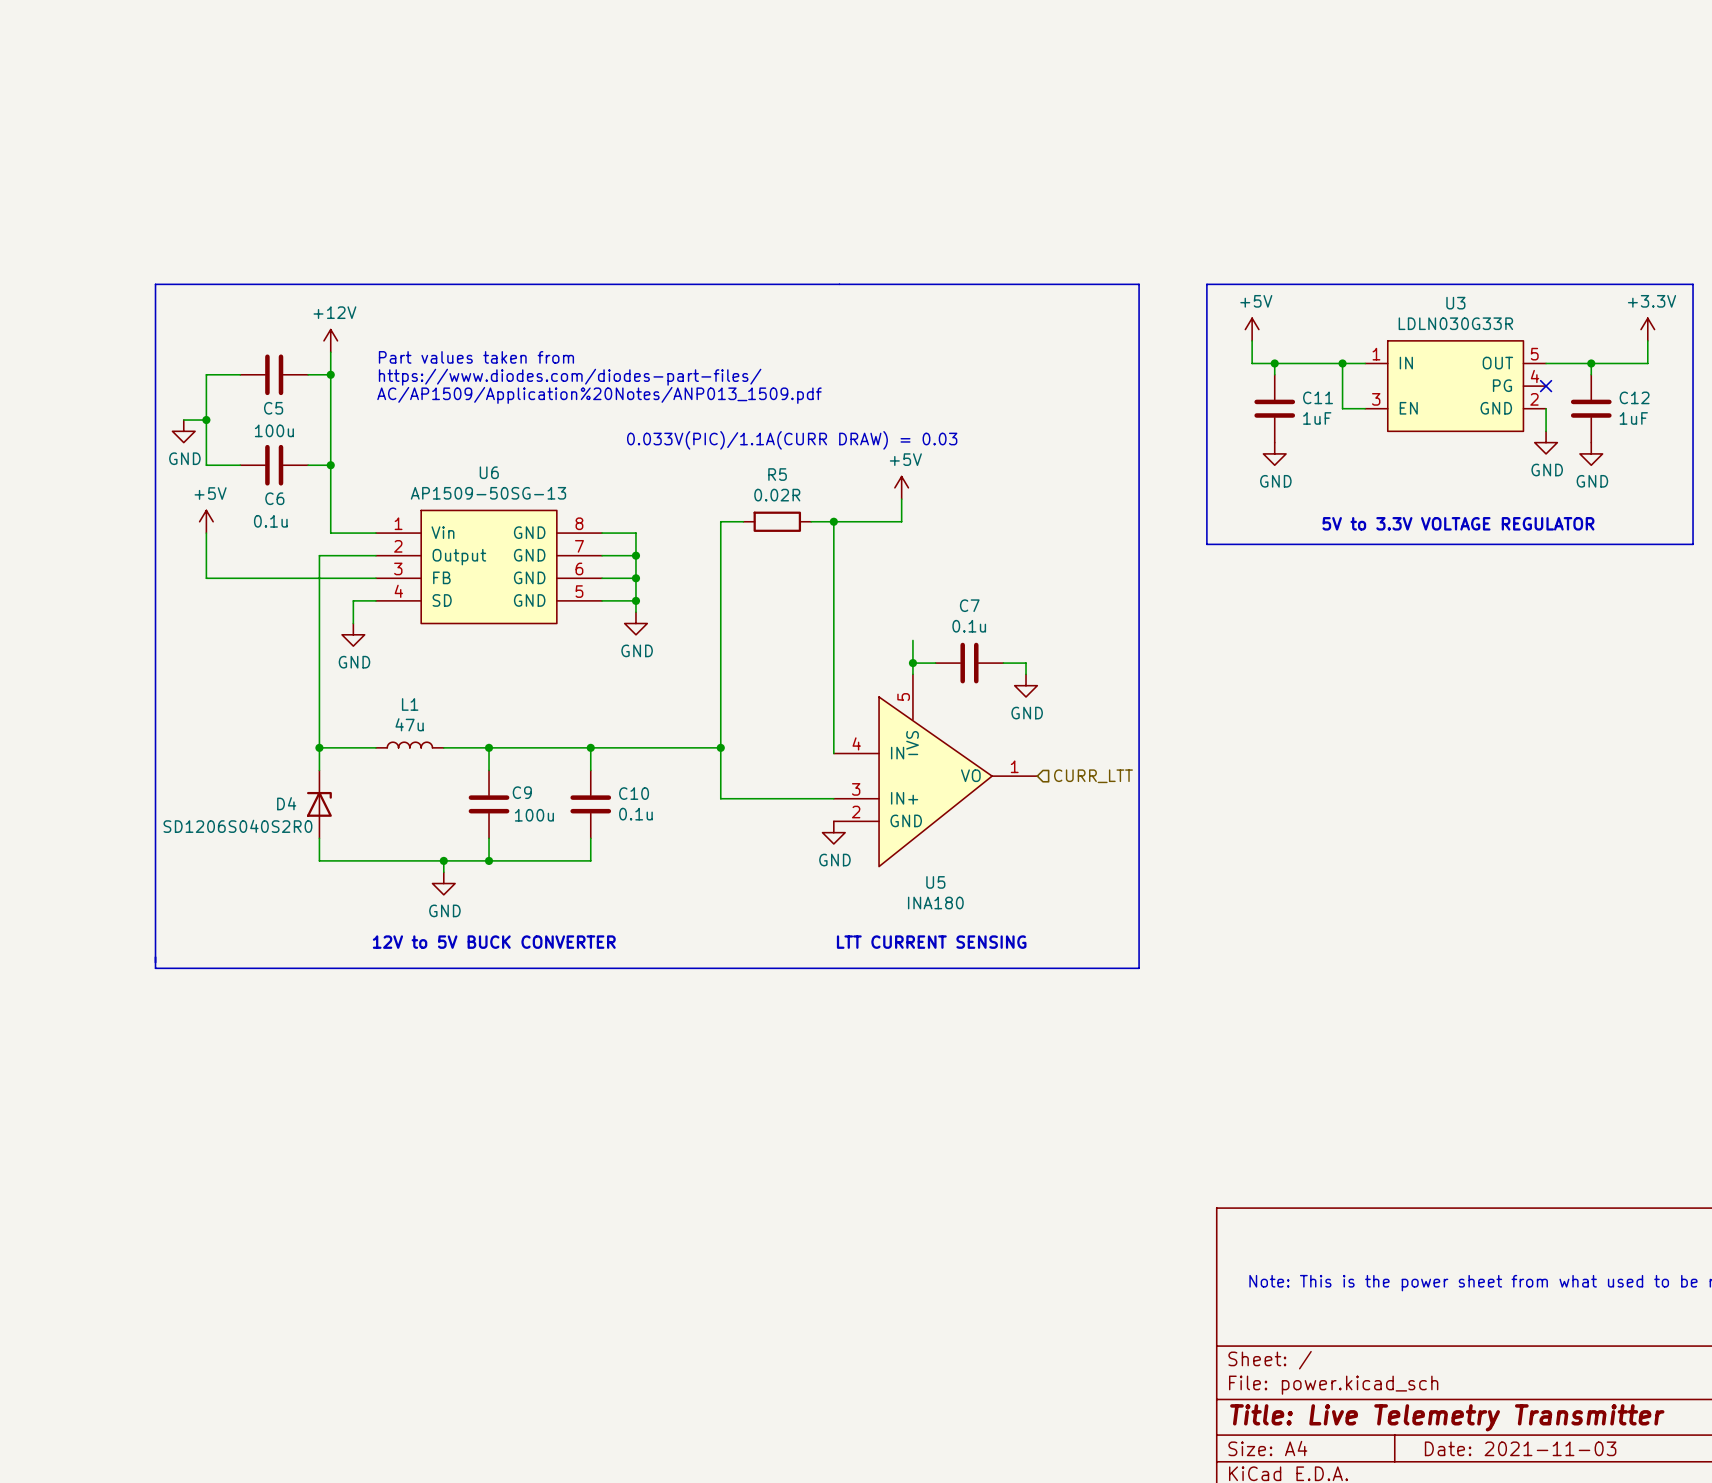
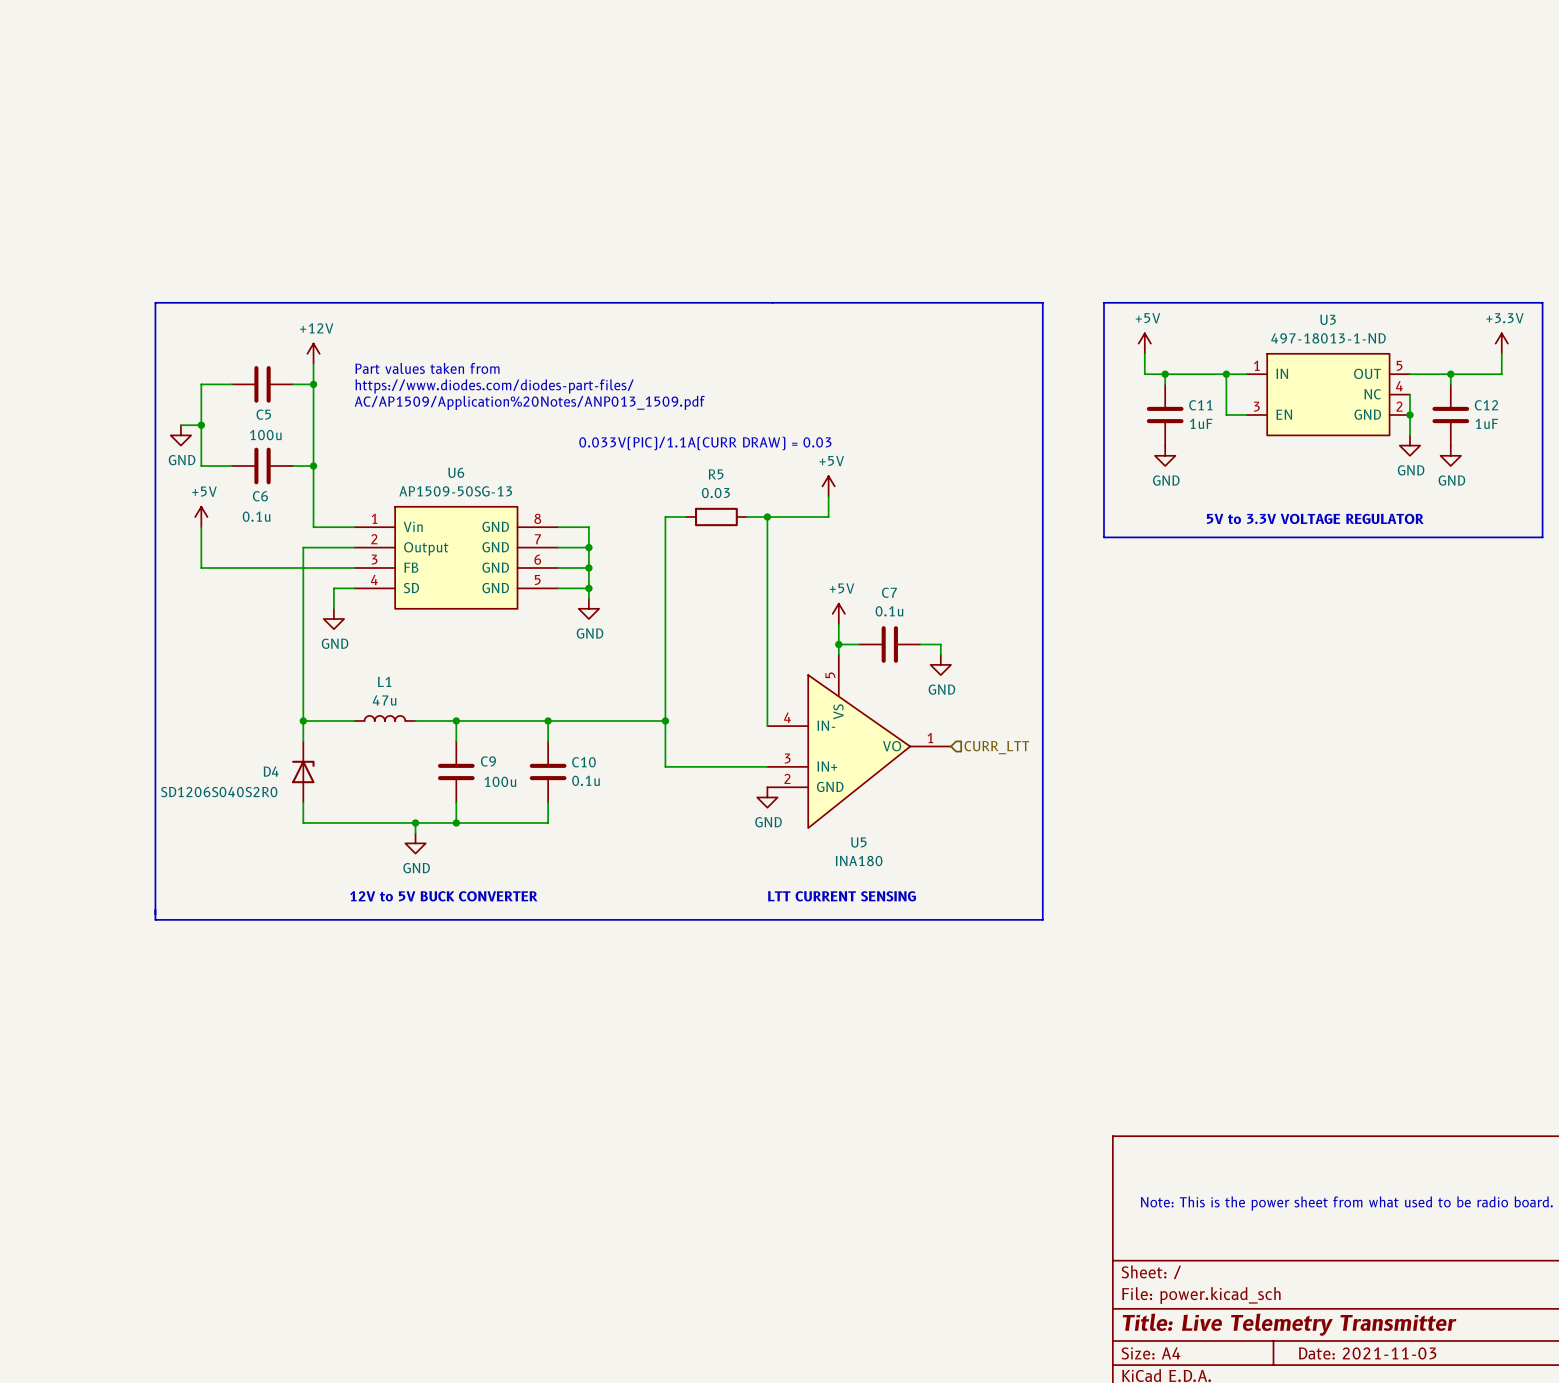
U3 value: LDLN030G33R (1455, 323) -> 497-18013-1-ND (1328, 338)
U3 pin name: PG (1502, 385) -> NC (1372, 394)
wire: none -> (1409, 394) (1409, 415)
no-connect mark: (1546, 386) -> none
junction: none -> (1409, 415)
R5 value: 0.02R (777, 495) -> 0.03 (715, 493)
power symbol: none -> +5V (838, 613)

